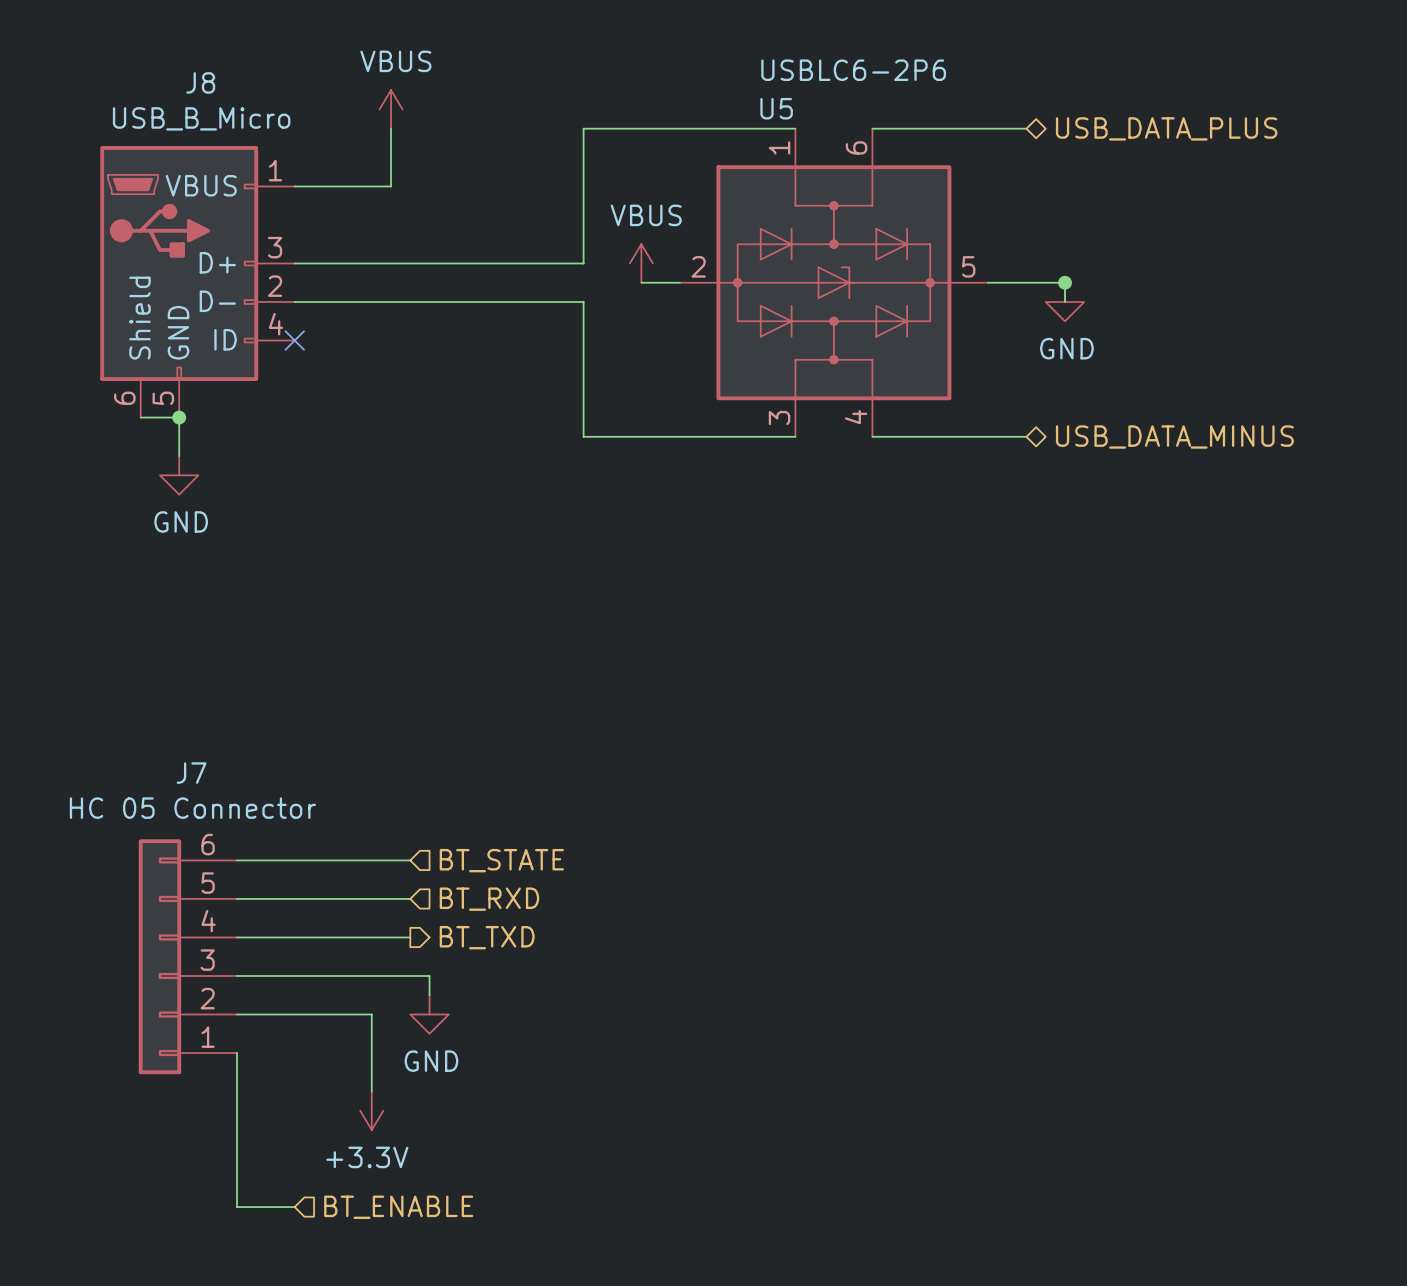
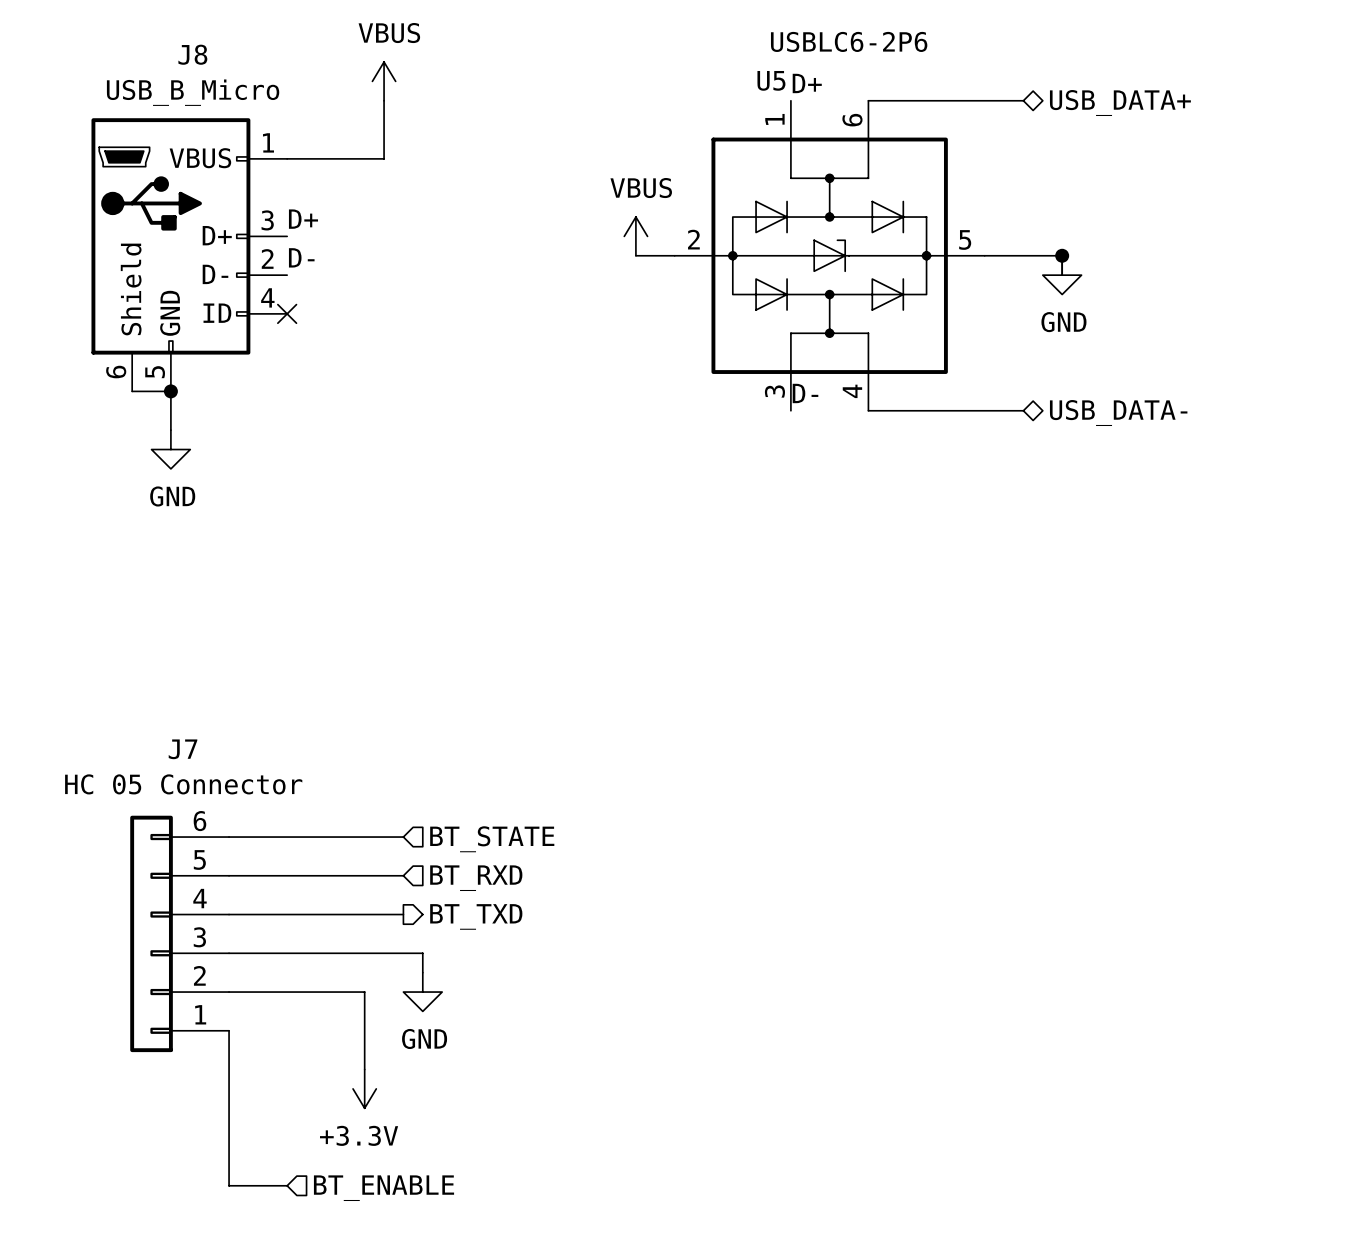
label: none -> D+ (807, 83)
wire: (795, 128) (583, 128) (583, 263) (294, 263) -> none
hierarchical label: USB_DATA_PLUS (1166, 128) -> USB_DATA+ (1120, 103)
label: none -> D+ (303, 219)
label: none -> D- (301, 257)
wire: (294, 302) (583, 302) (583, 436) (795, 436) -> none
label: none -> D- (805, 393)
hierarchical label: USB_DATA_MINUS (1174, 437) -> USB_DATA- (1118, 413)

